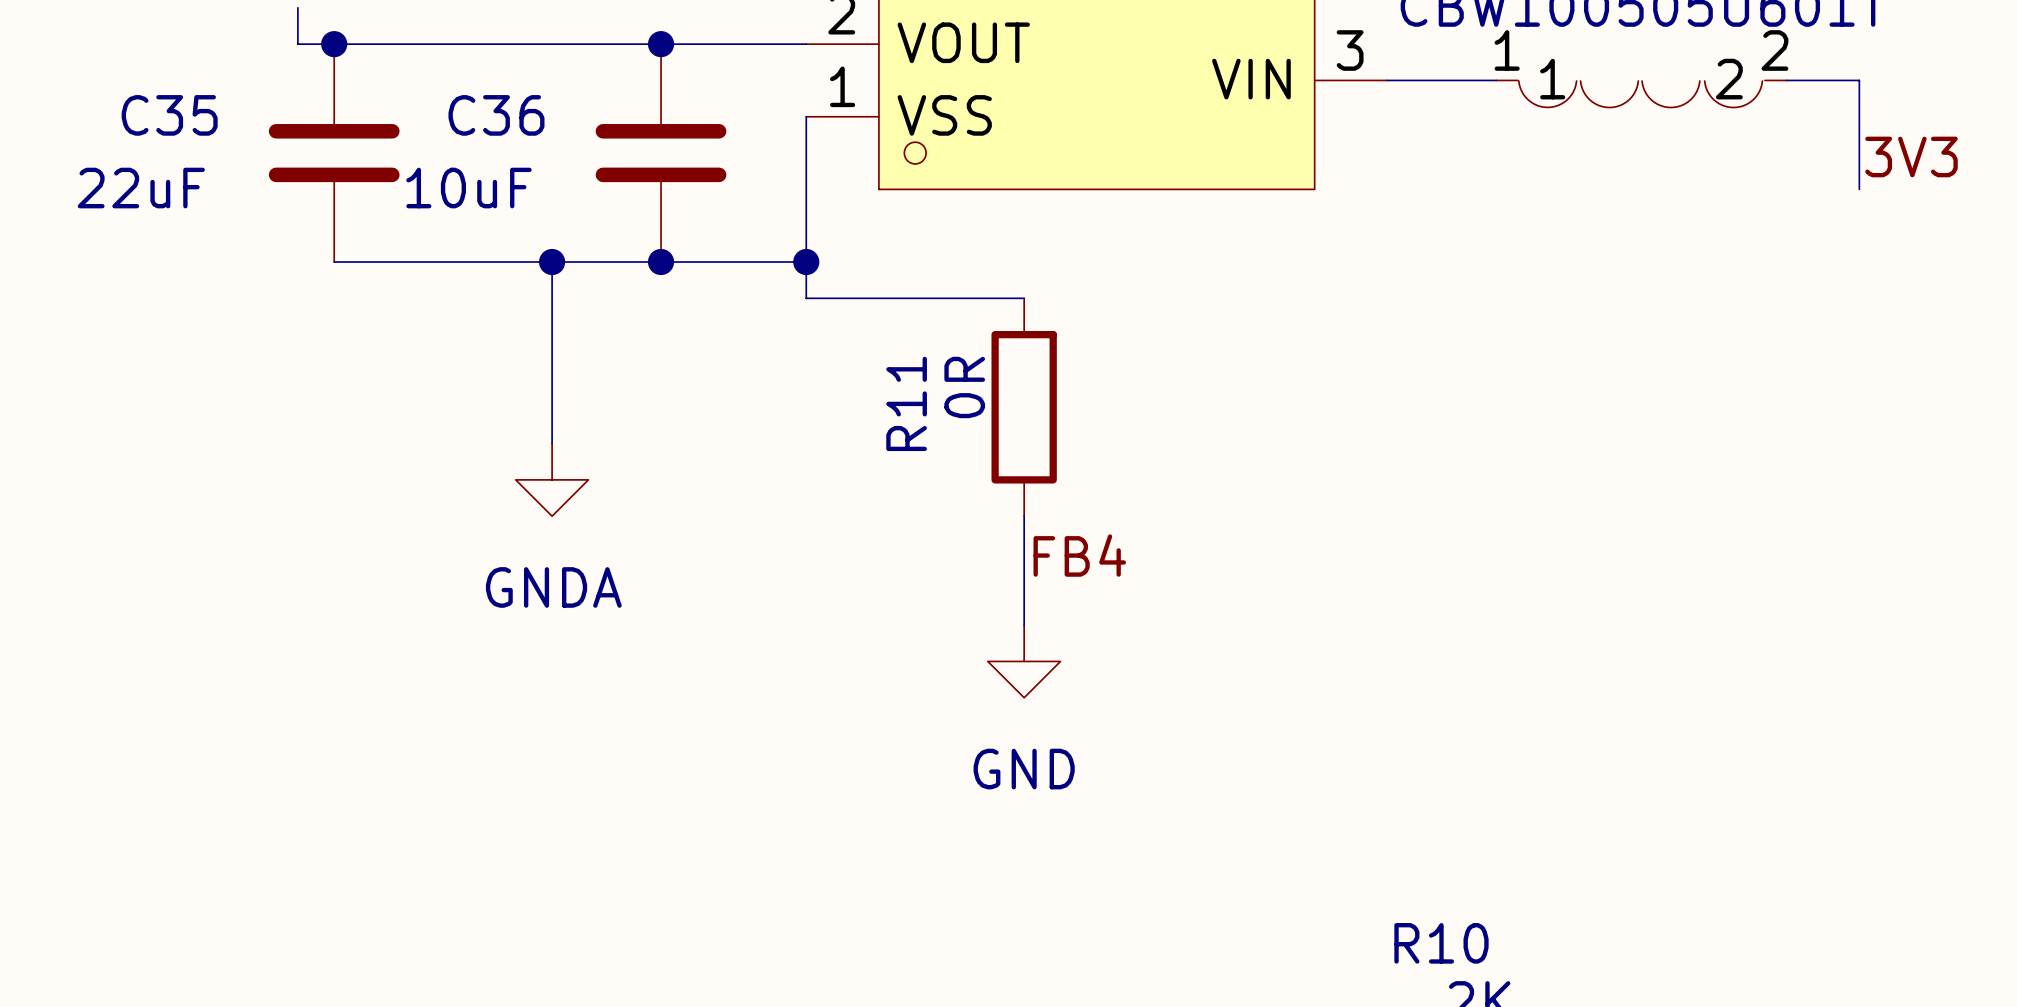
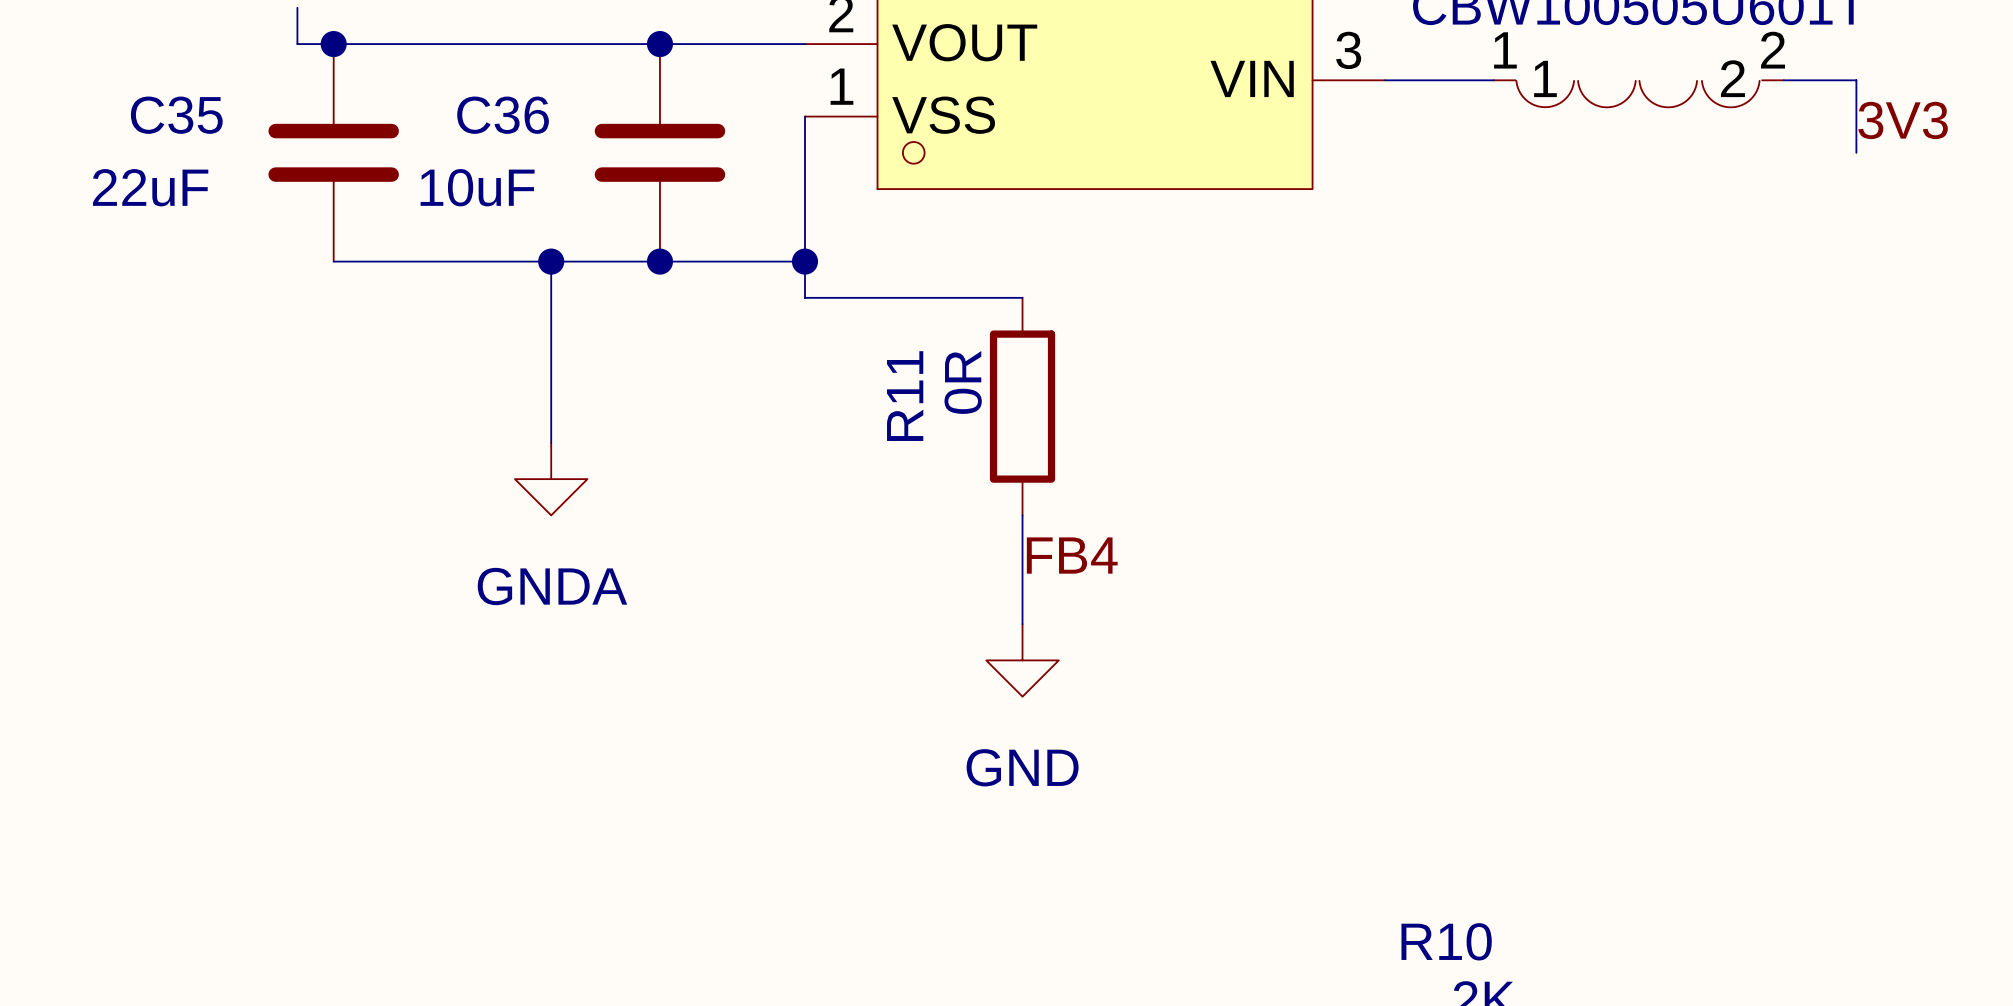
wire: (1859, 153) (1859, 189) -> none
label position: 3V3 (1911, 156) -> 3V3 (1903, 120)

